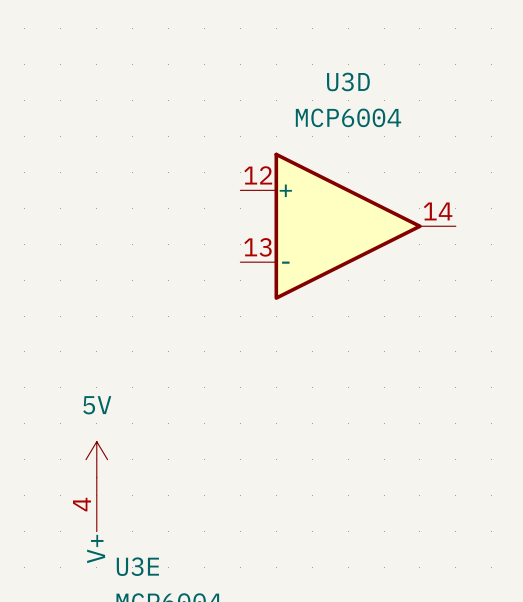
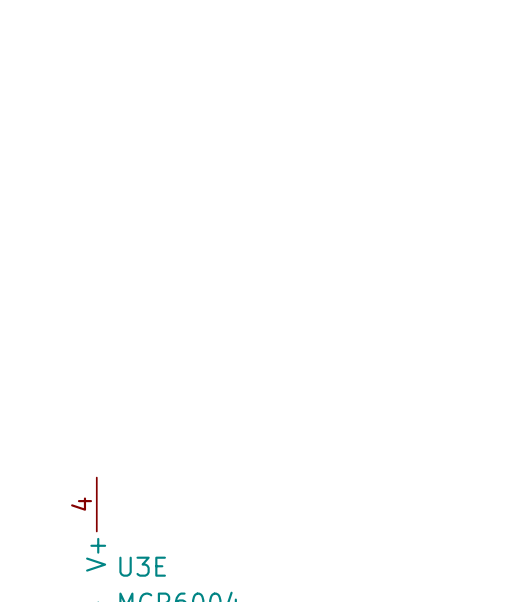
U3D: MCP6004 (348, 226) -> none
power symbol: 5V (96, 459) -> none

